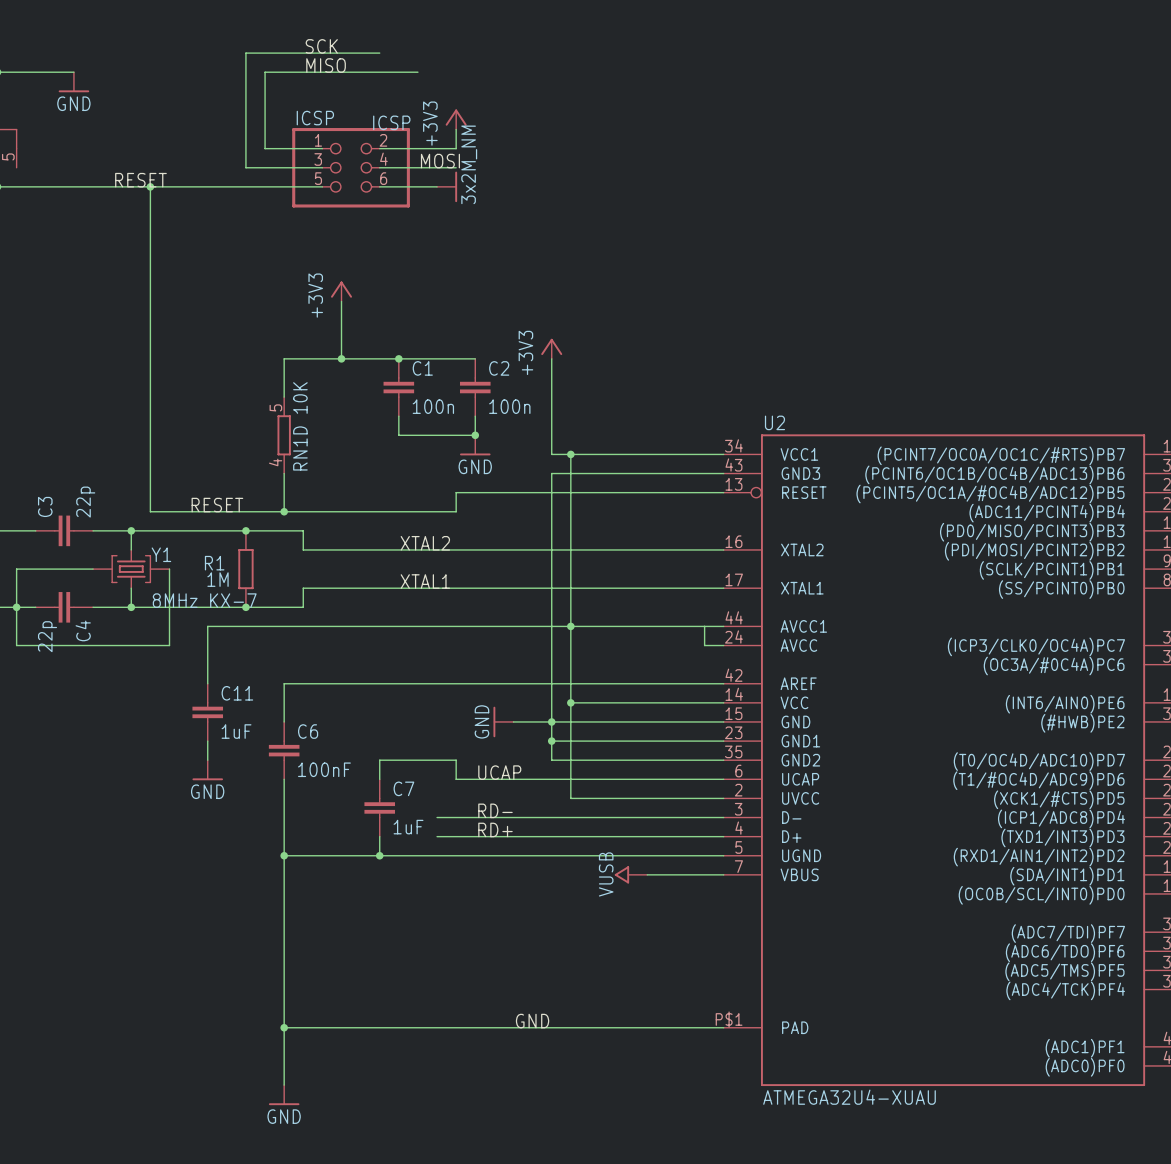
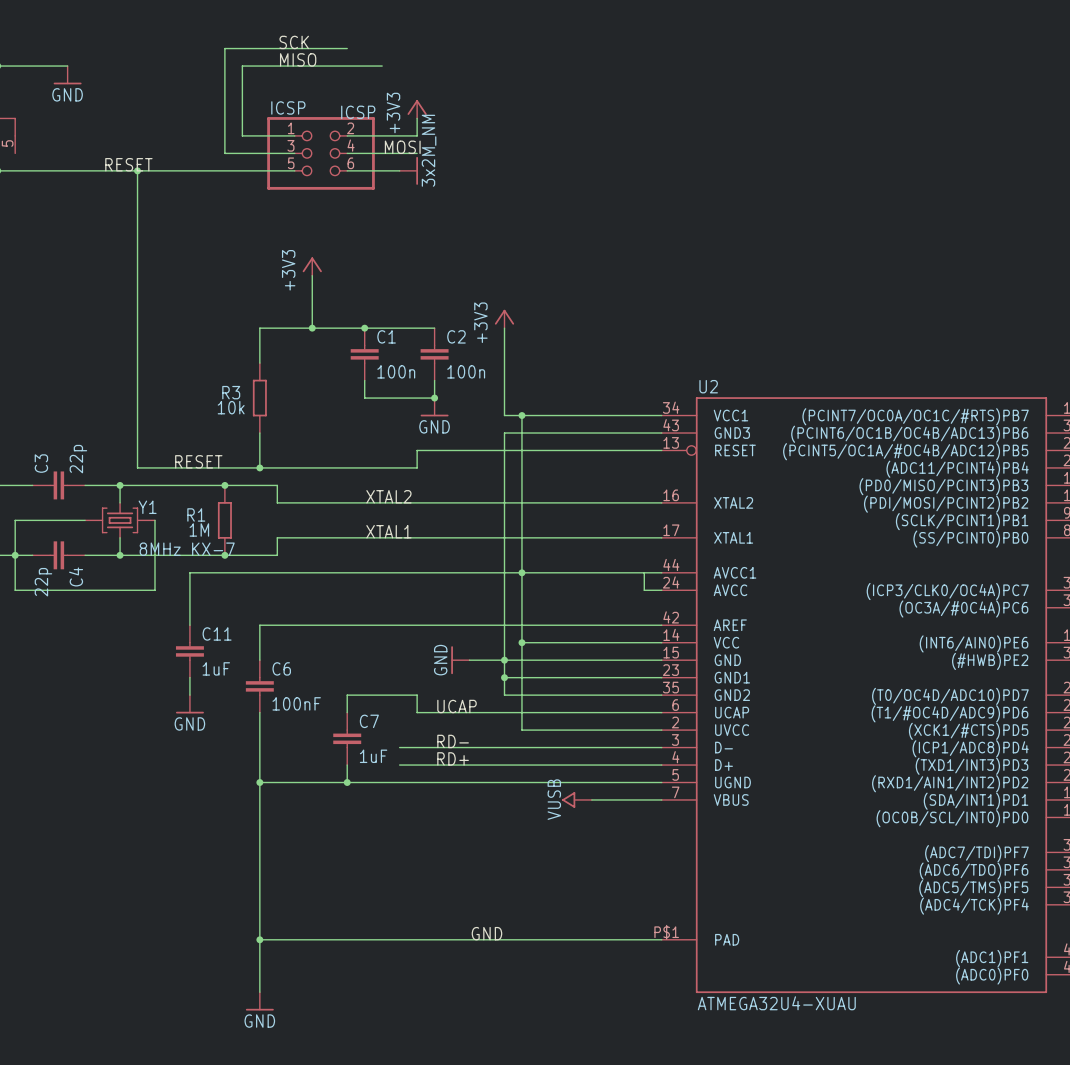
RN1D: 10K (284, 435) -> none
R3: none -> 10k (259, 398)

